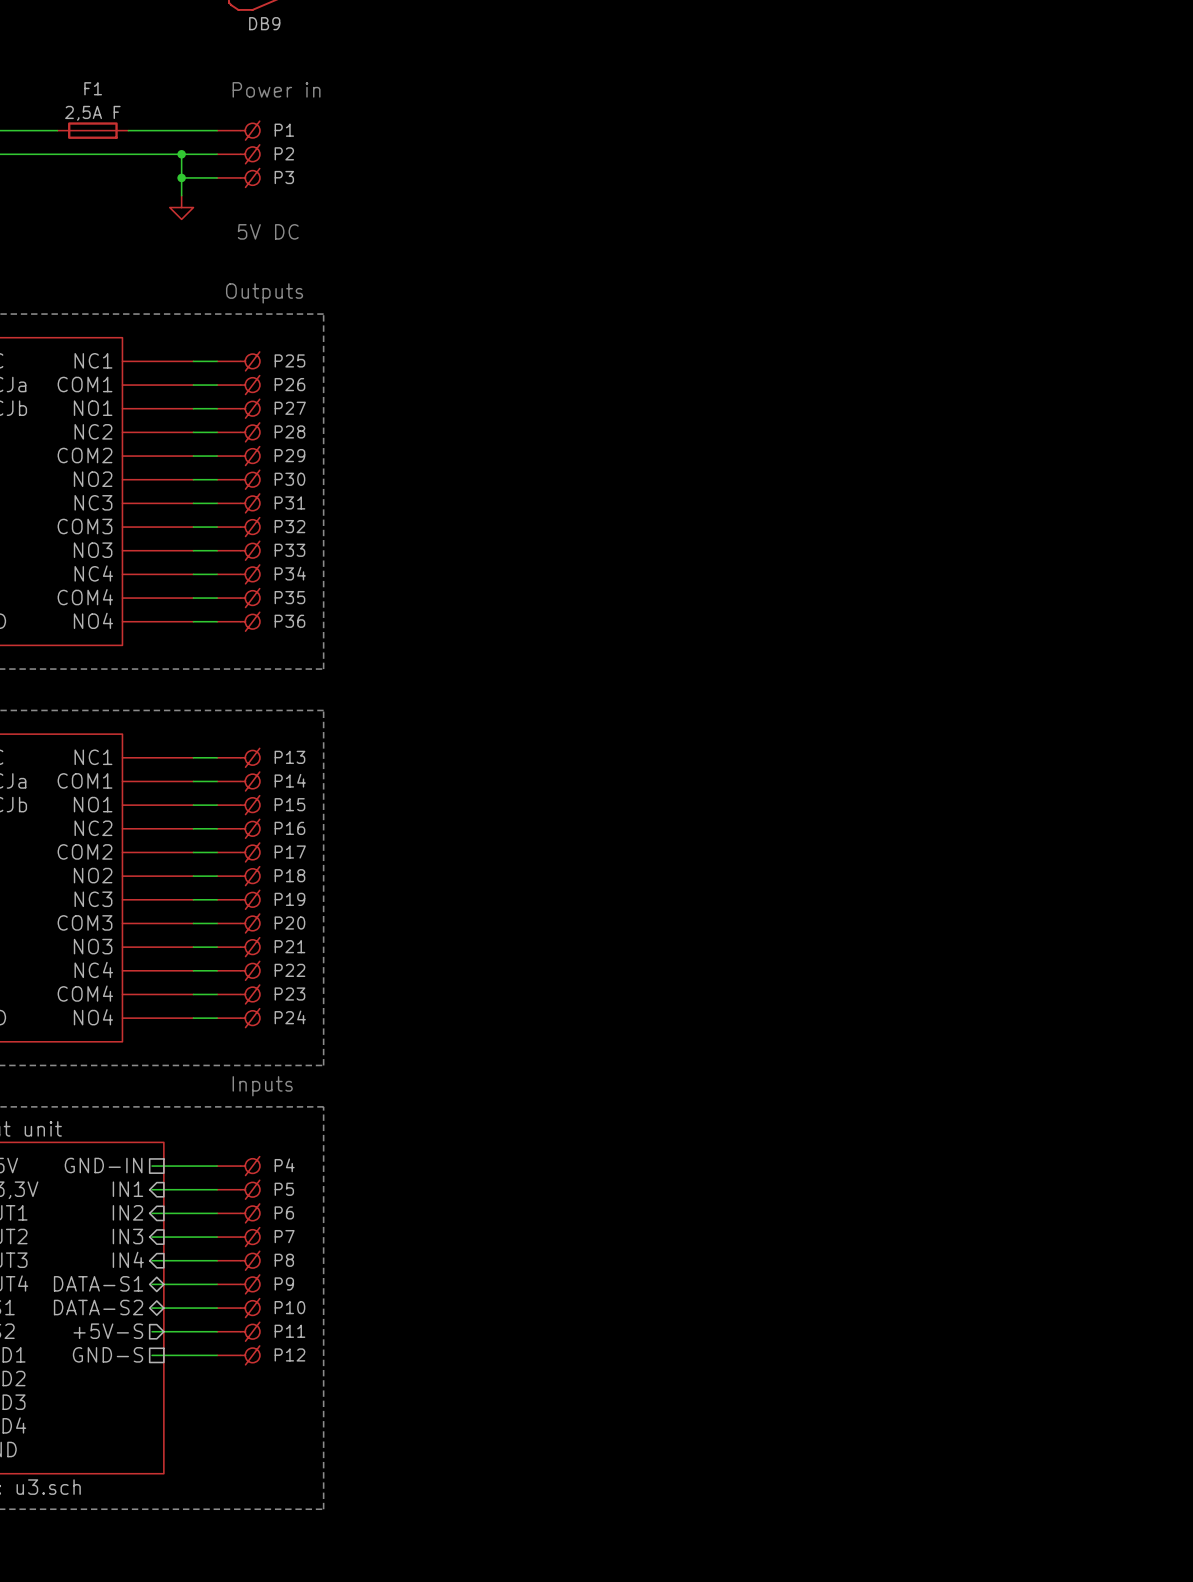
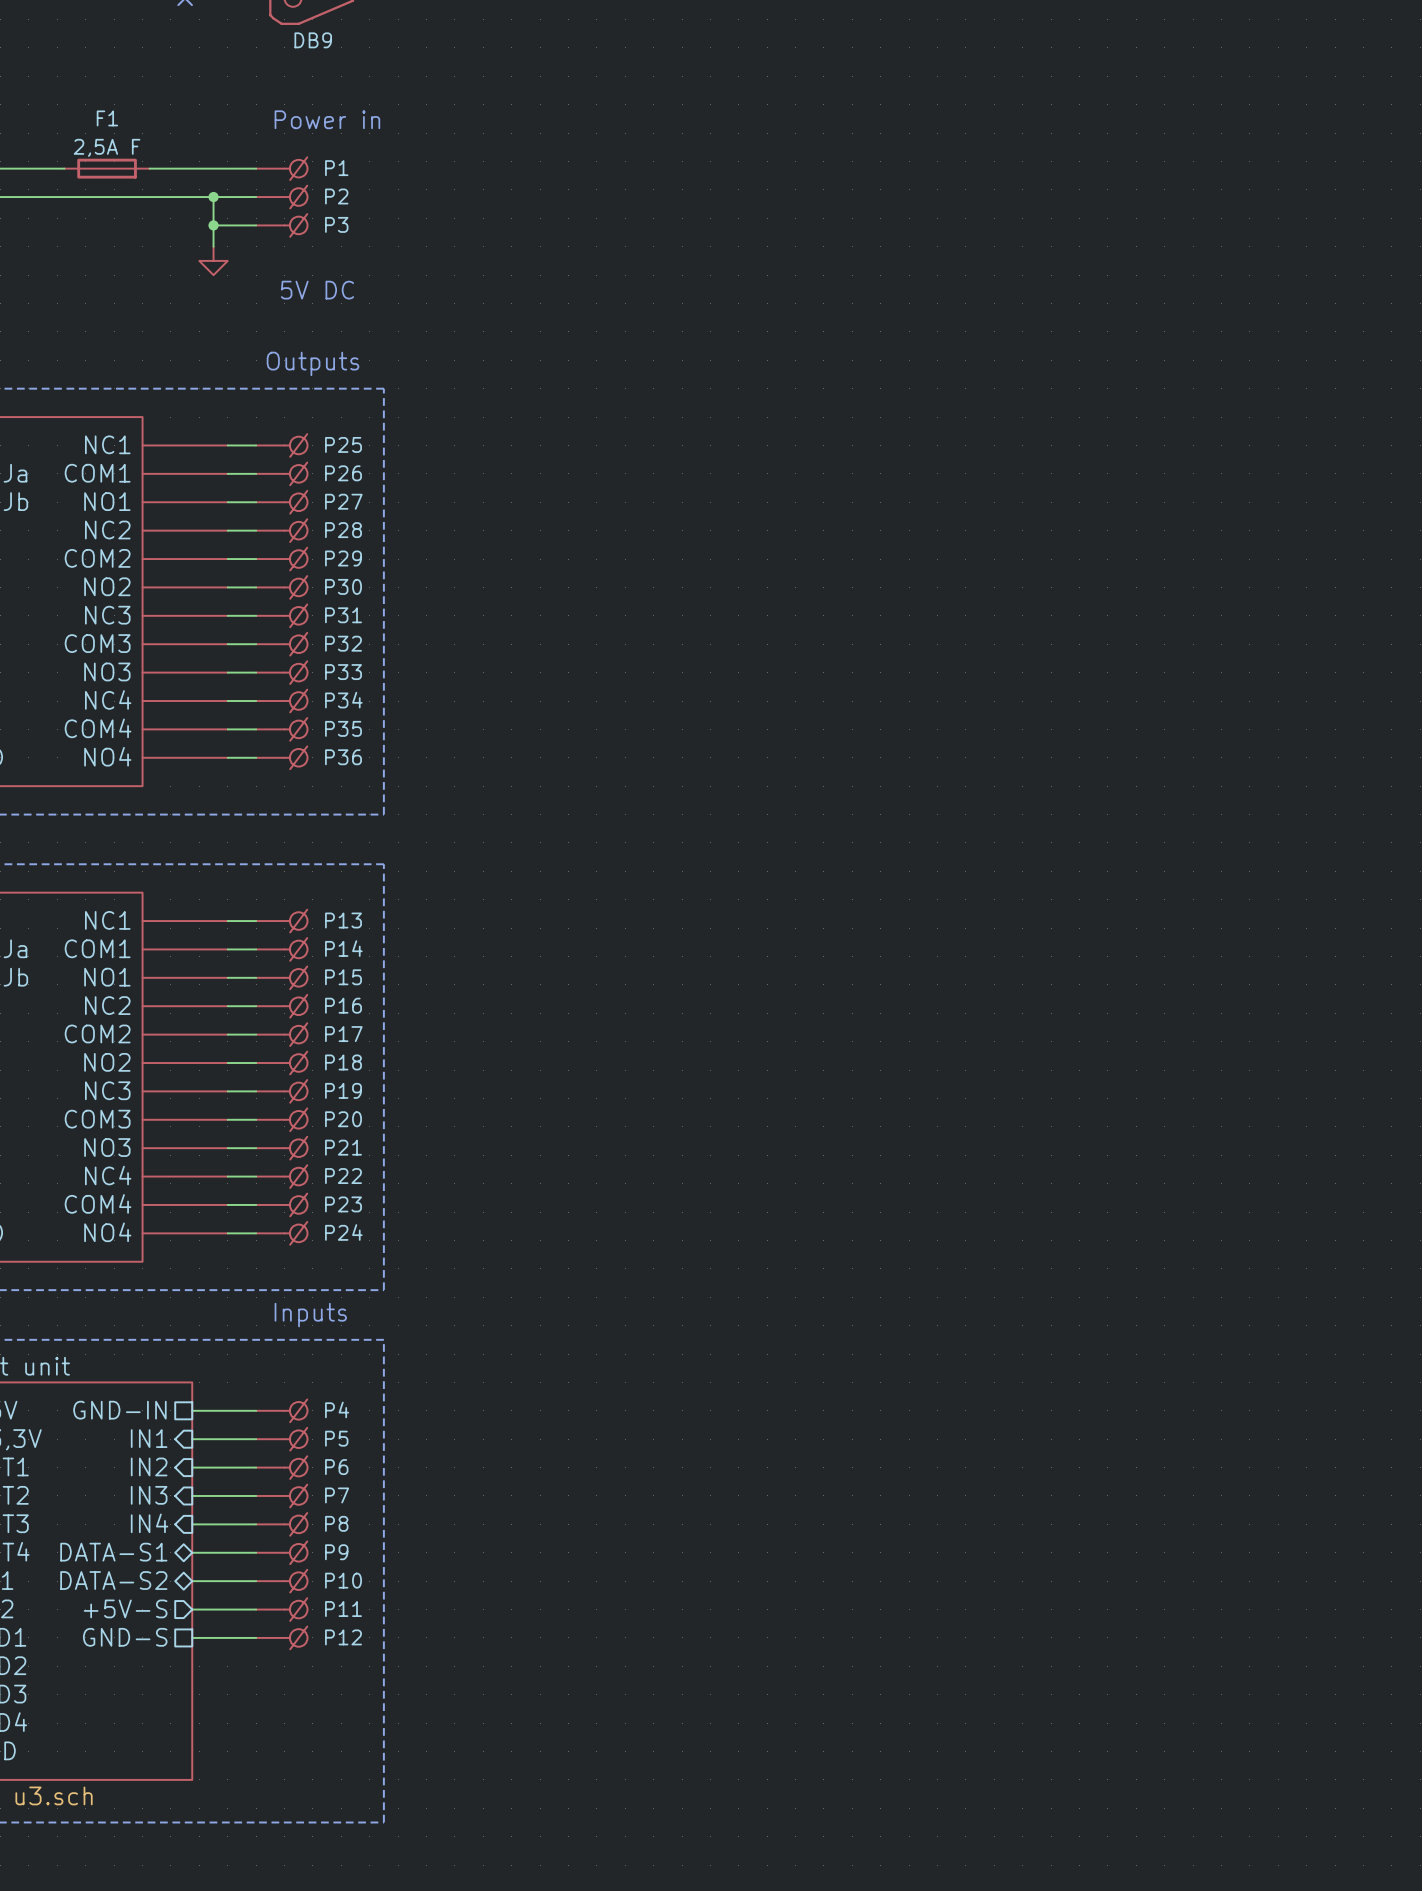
wire: (152, 1166) (163, 1166) -> none
wire: (152, 1189) (163, 1189) -> none
wire: (152, 1213) (163, 1213) -> none
wire: (152, 1237) (163, 1237) -> none
wire: (152, 1260) (163, 1260) -> none
wire: (152, 1284) (163, 1284) -> none
wire: (152, 1308) (163, 1308) -> none
wire: (152, 1331) (163, 1331) -> none
wire: (152, 1355) (163, 1355) -> none

